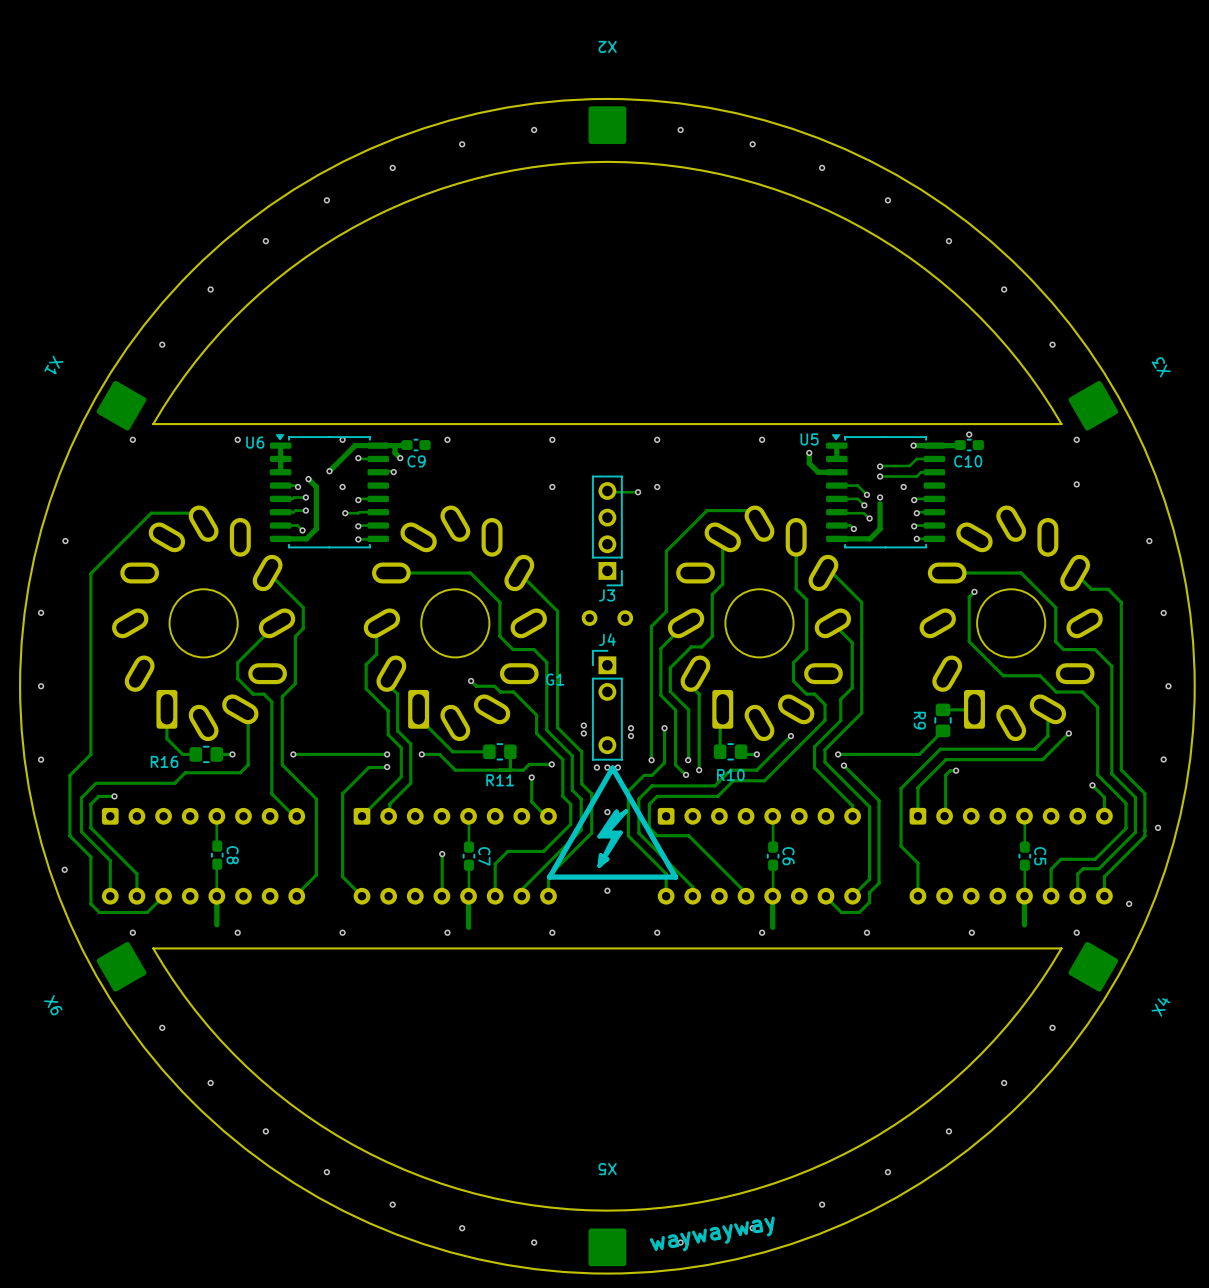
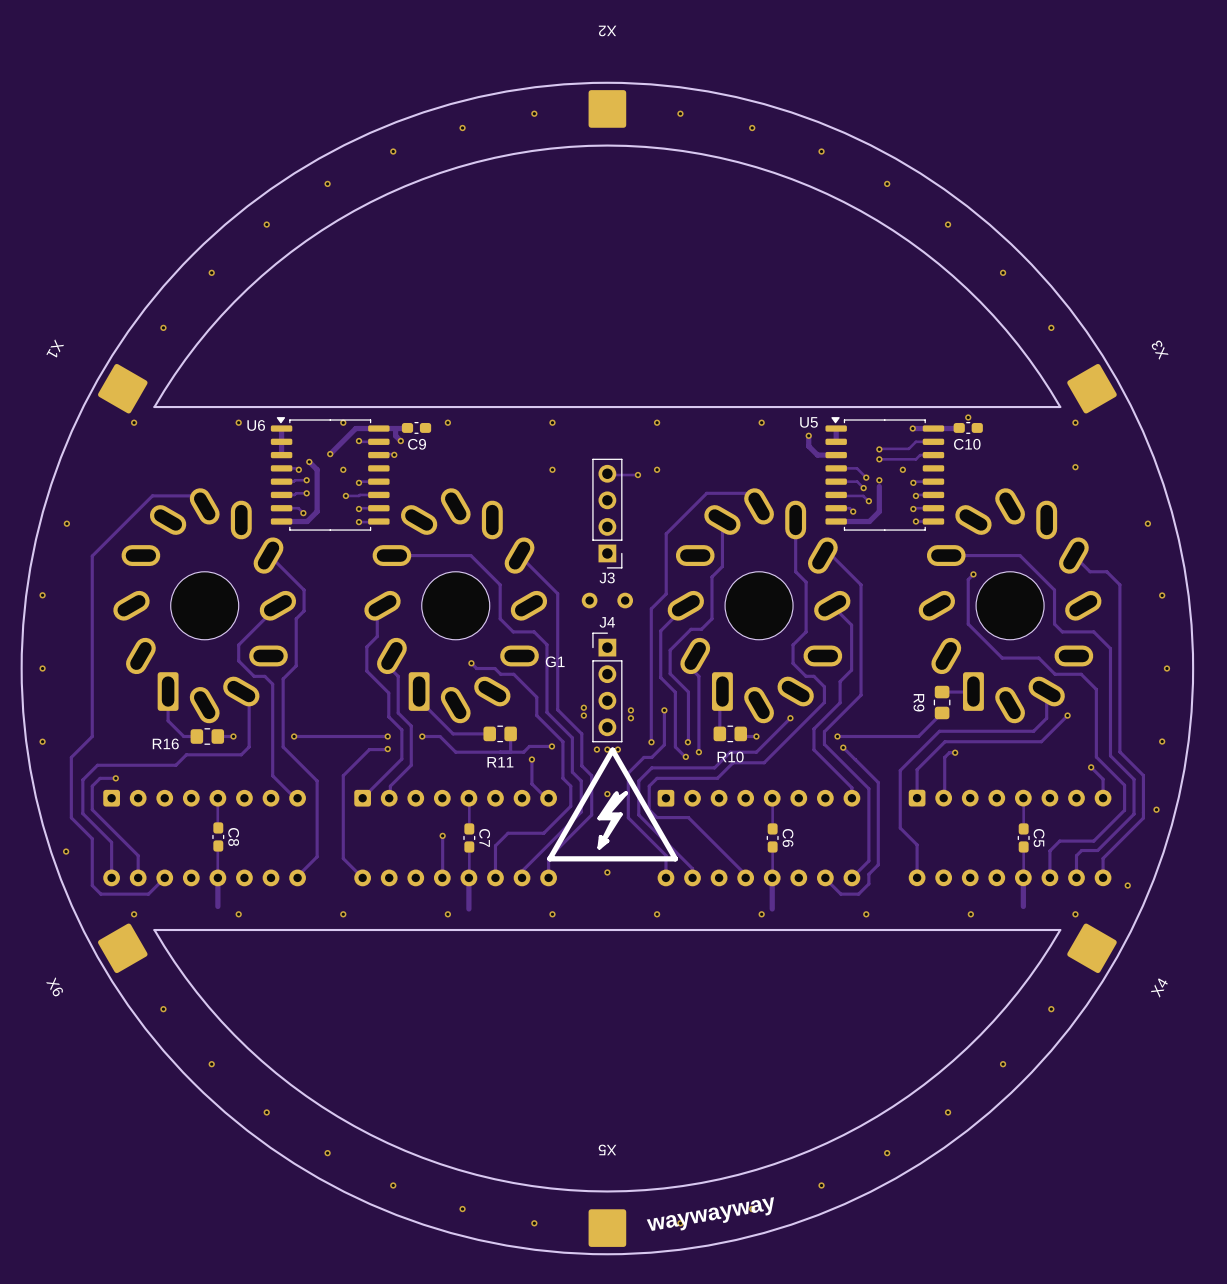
J4 footprint: [592, 650, 623, 761] -> [592, 632, 623, 743]

